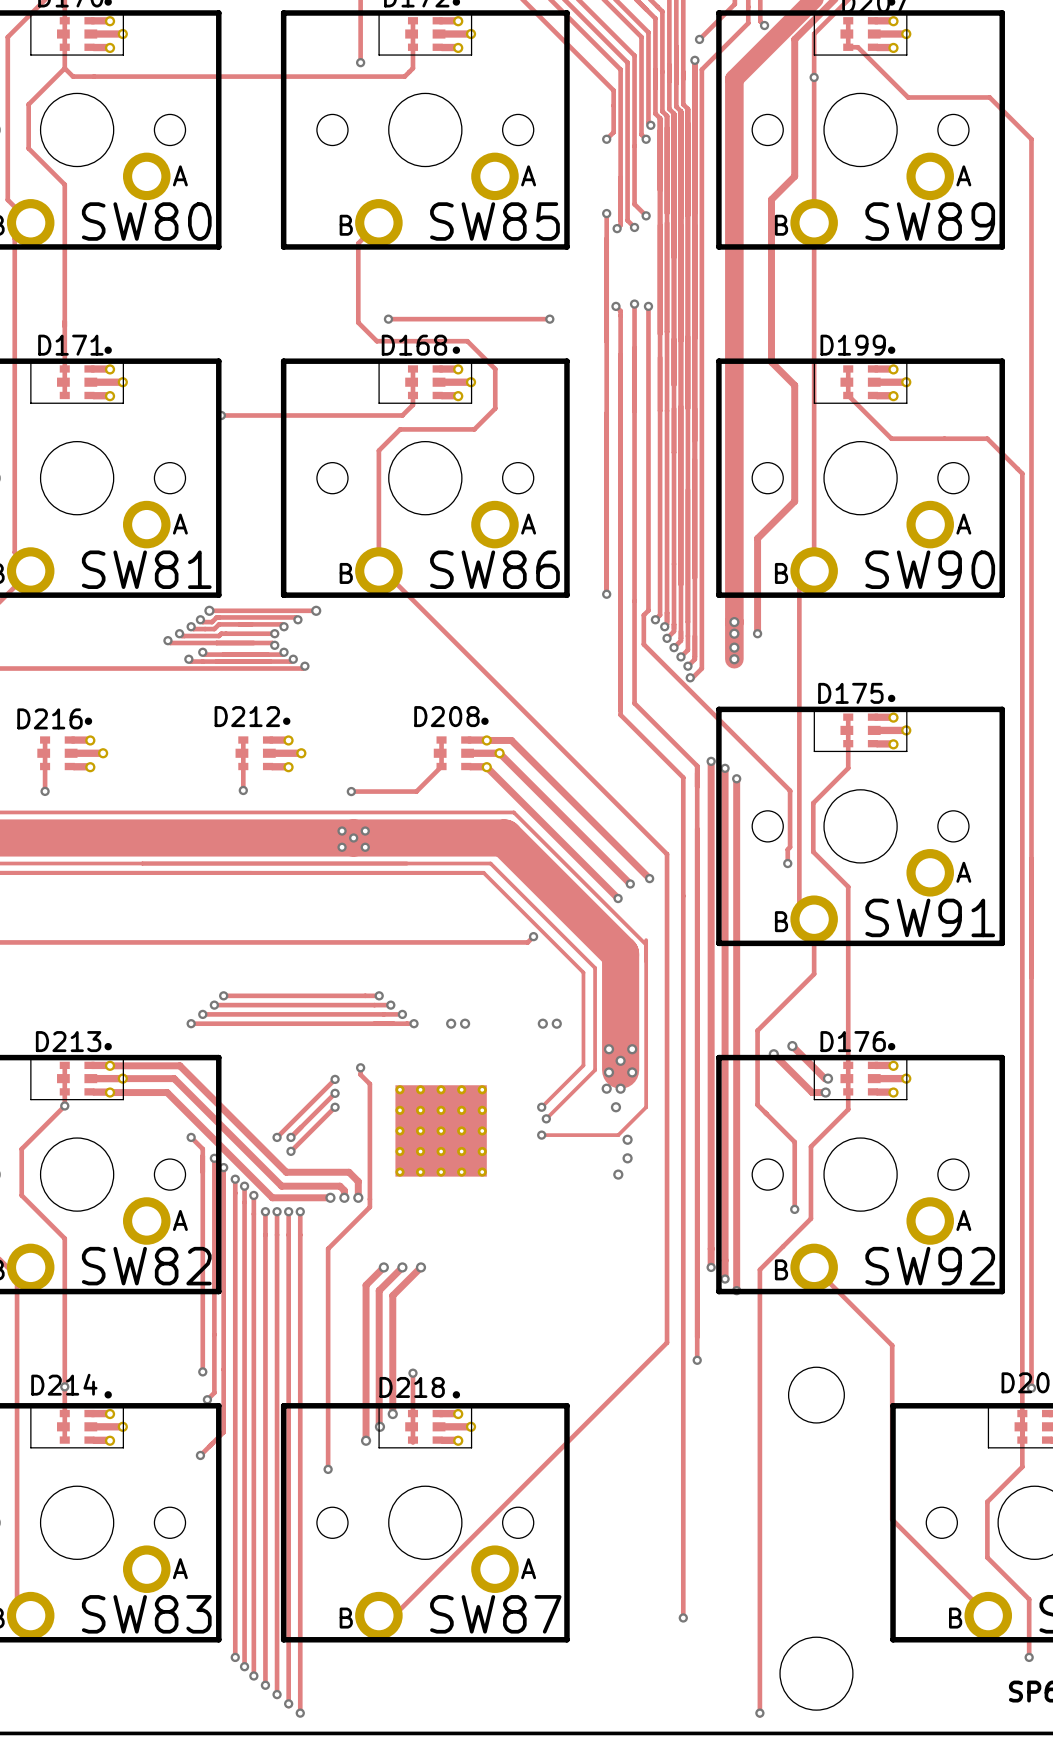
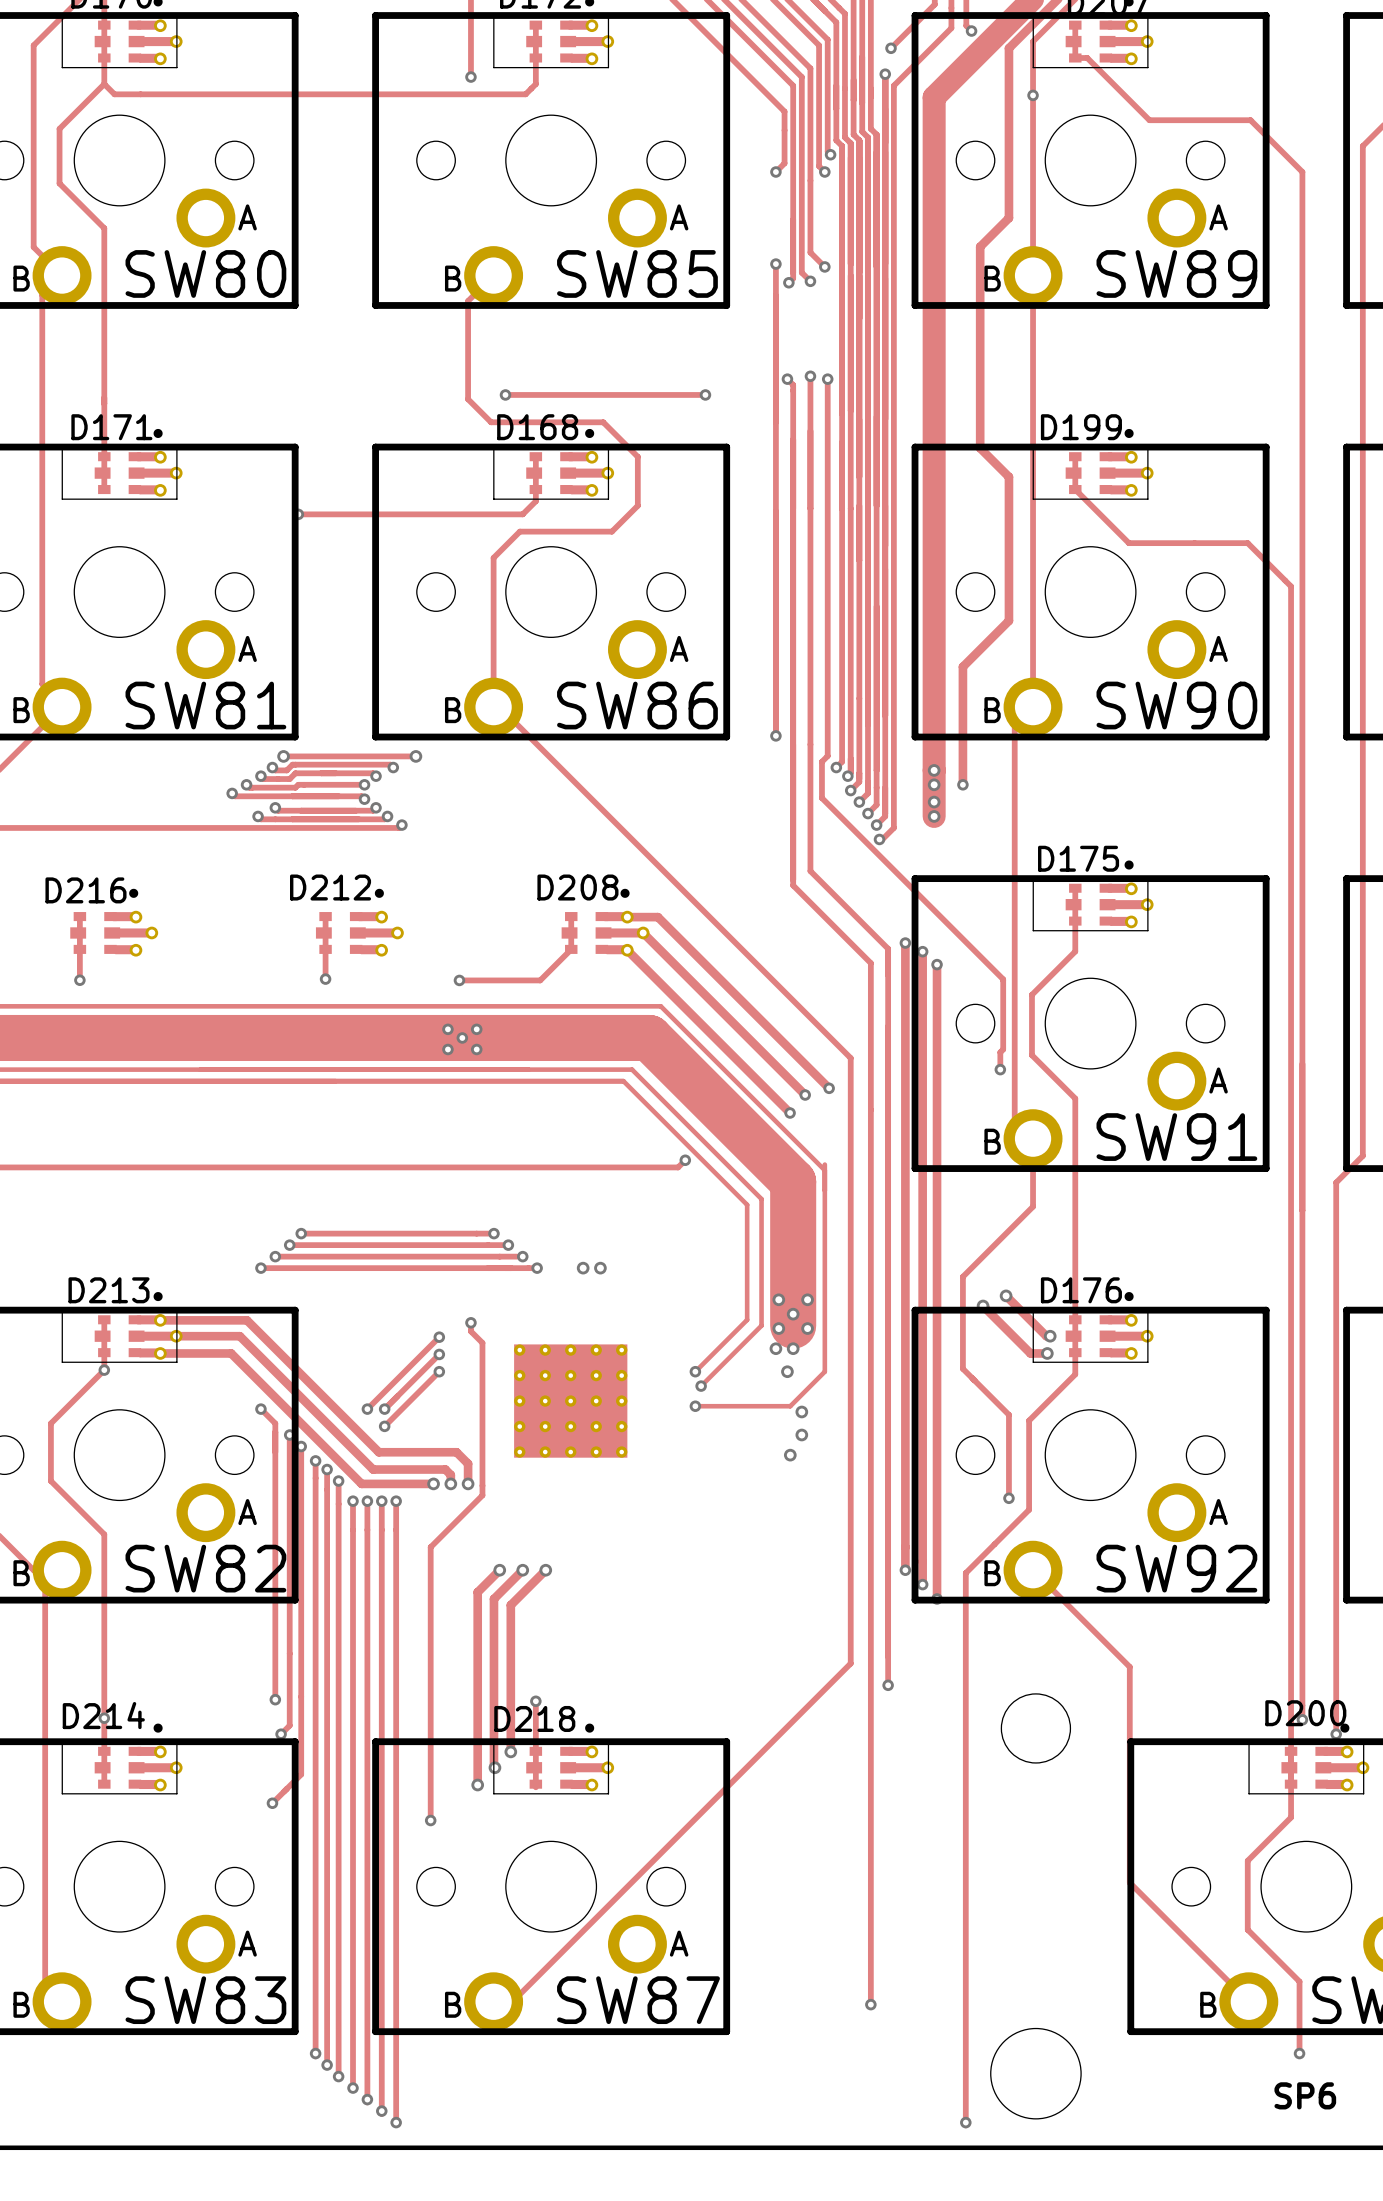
via: (542, 1023) -> none
via: (556, 1023) -> none

